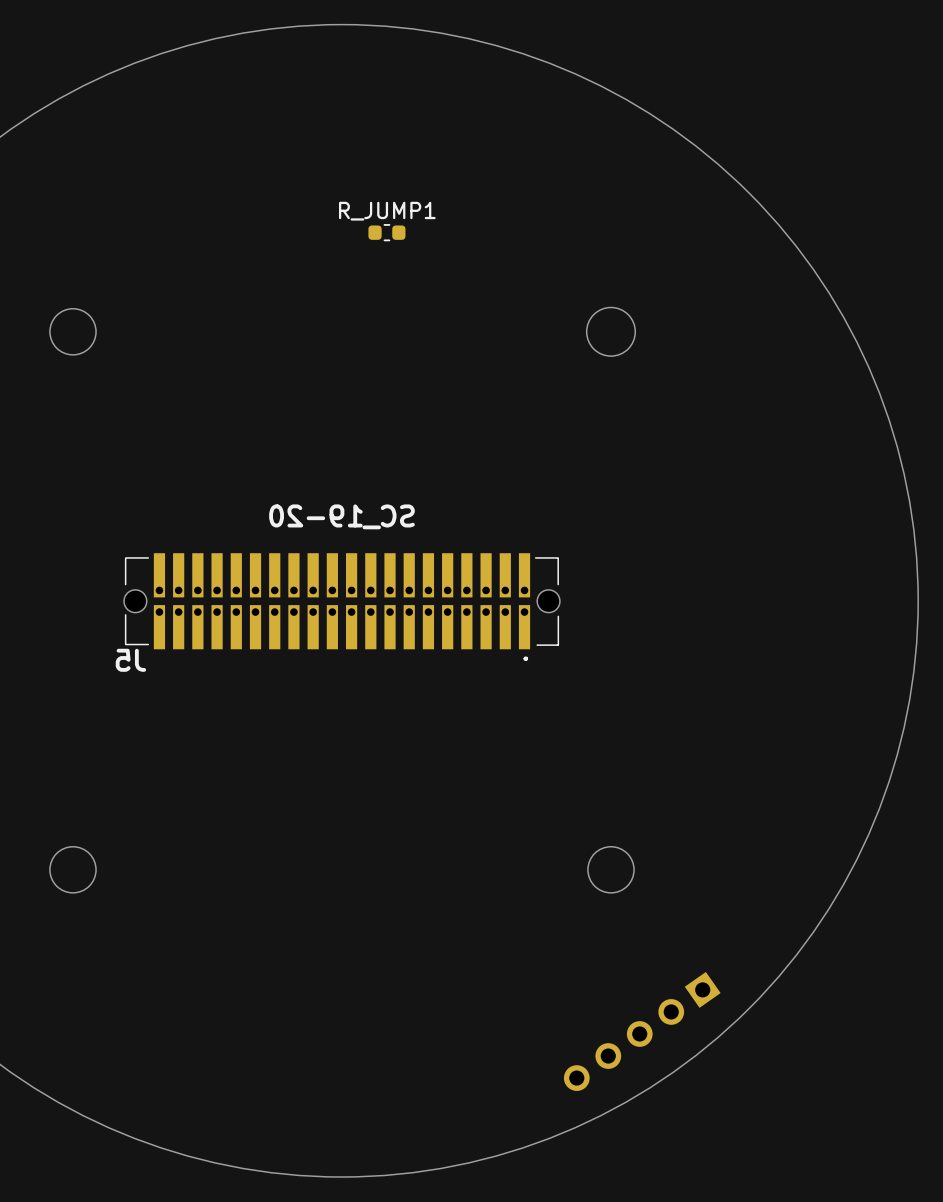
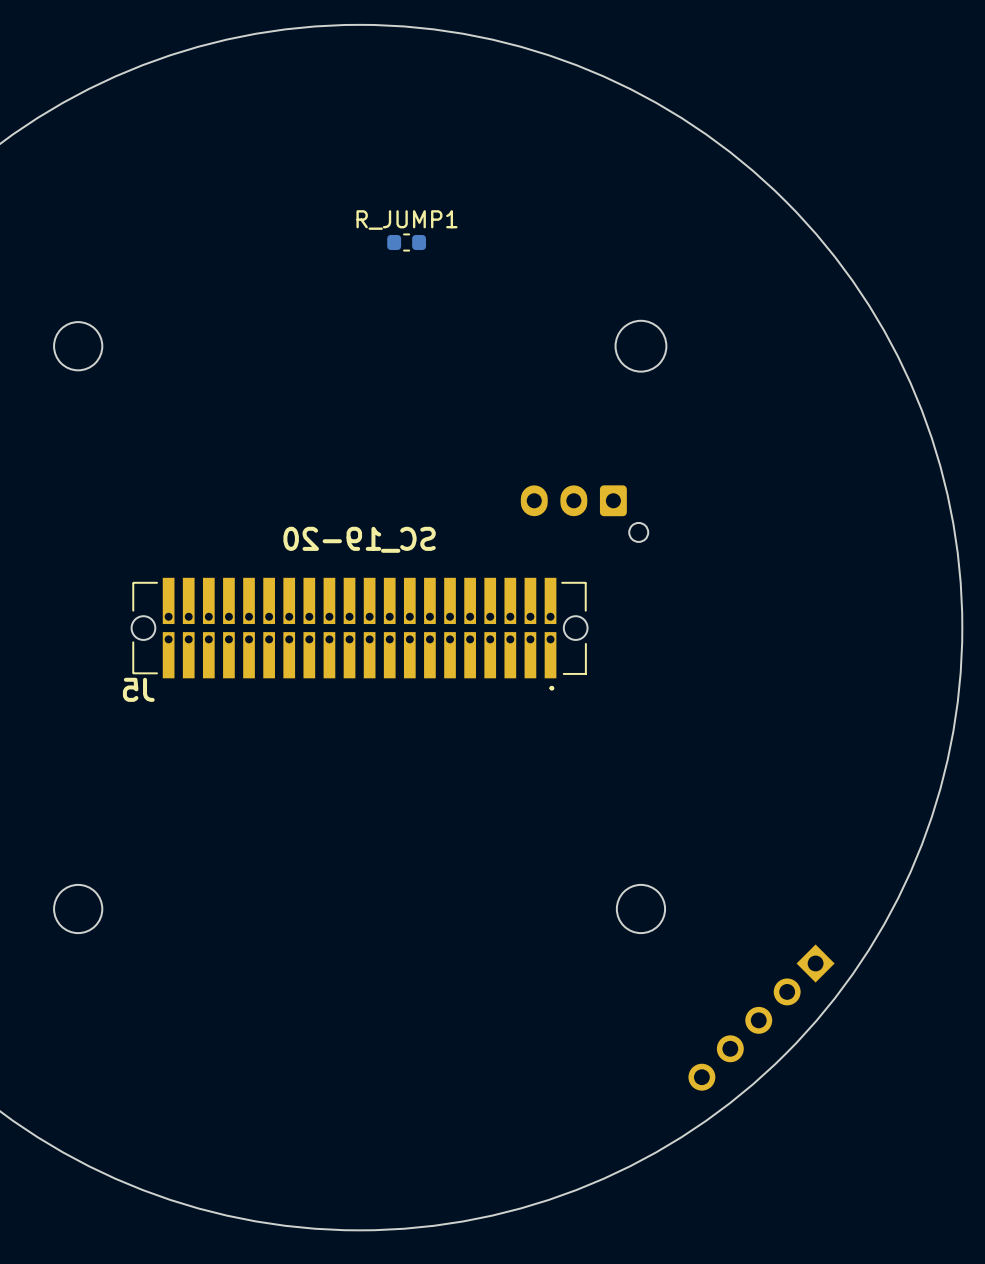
part: none -> (584, 513)
part: none -> (761, 1017)
part: (642, 1031) -> none

